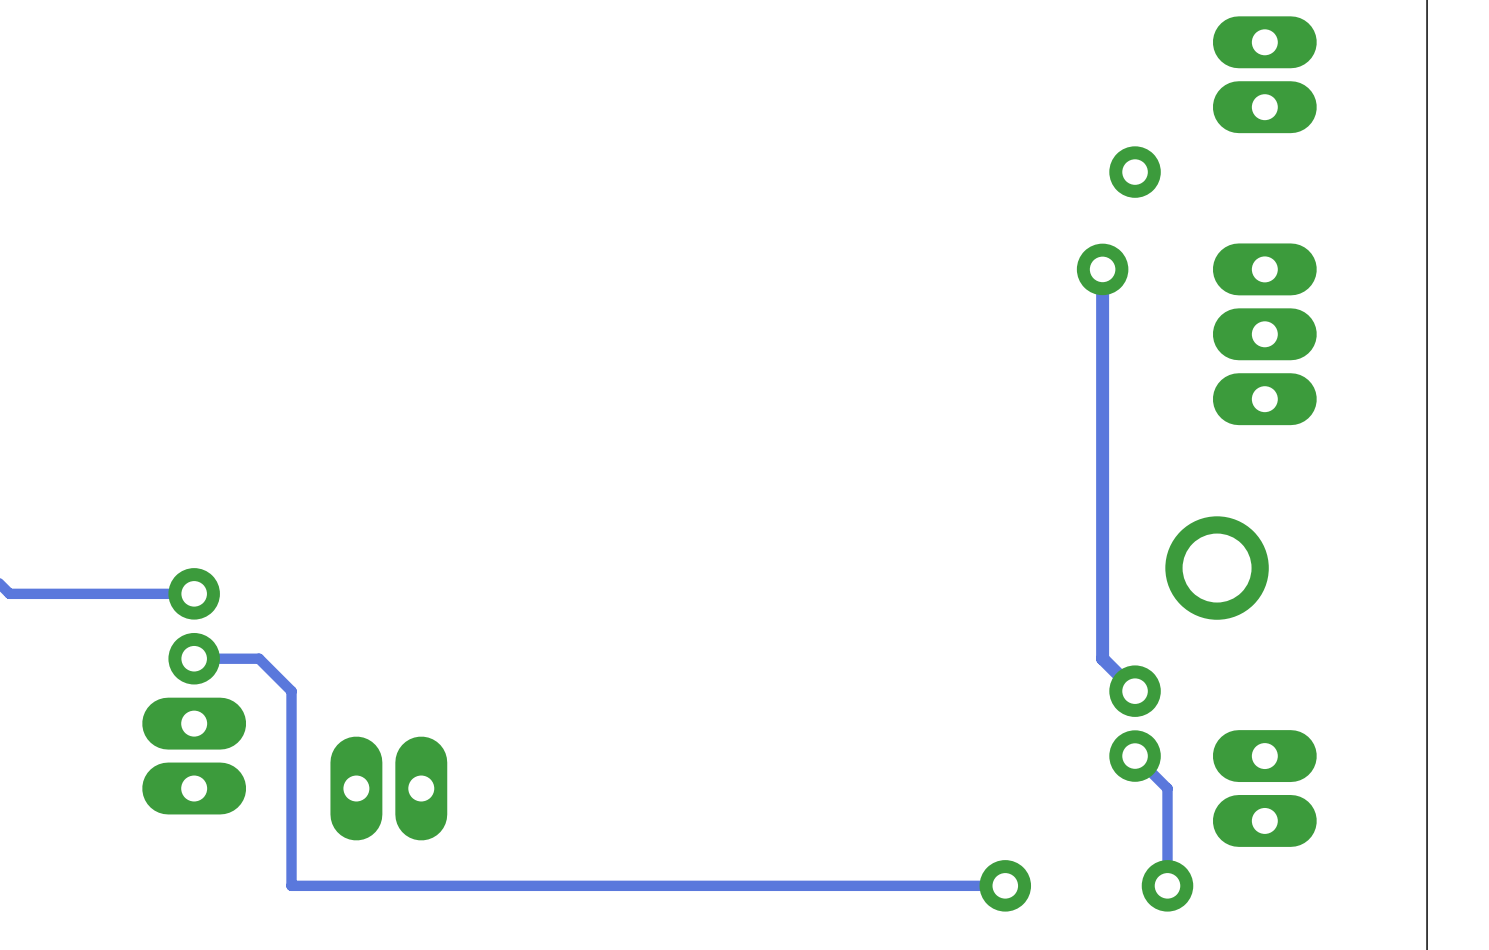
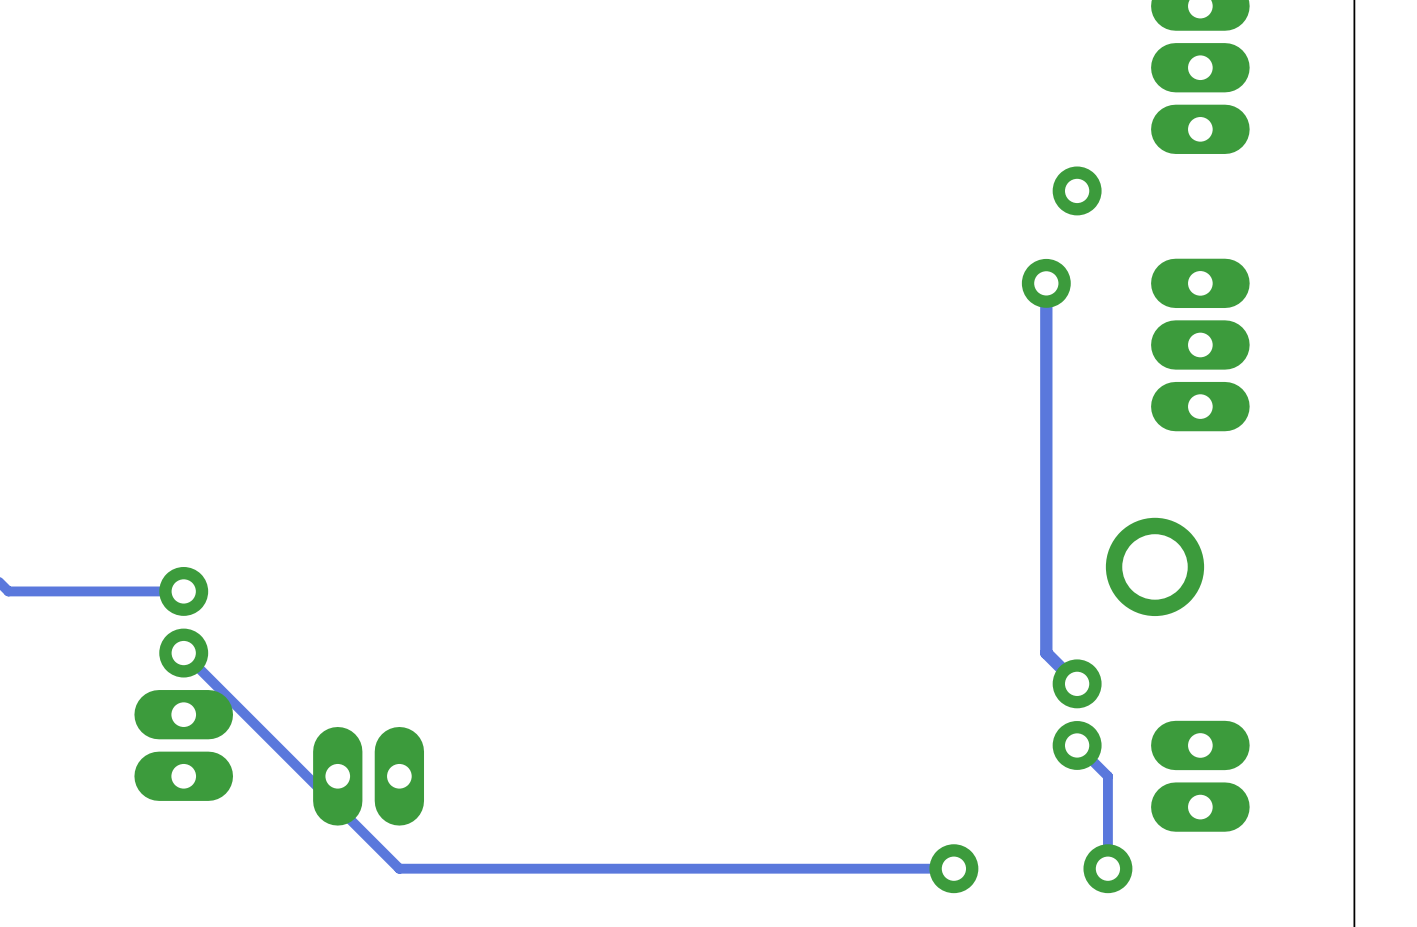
track: (194, 658) (259, 658) (291, 691) (291, 885) (421, 885) -> (183, 653) (399, 868)

